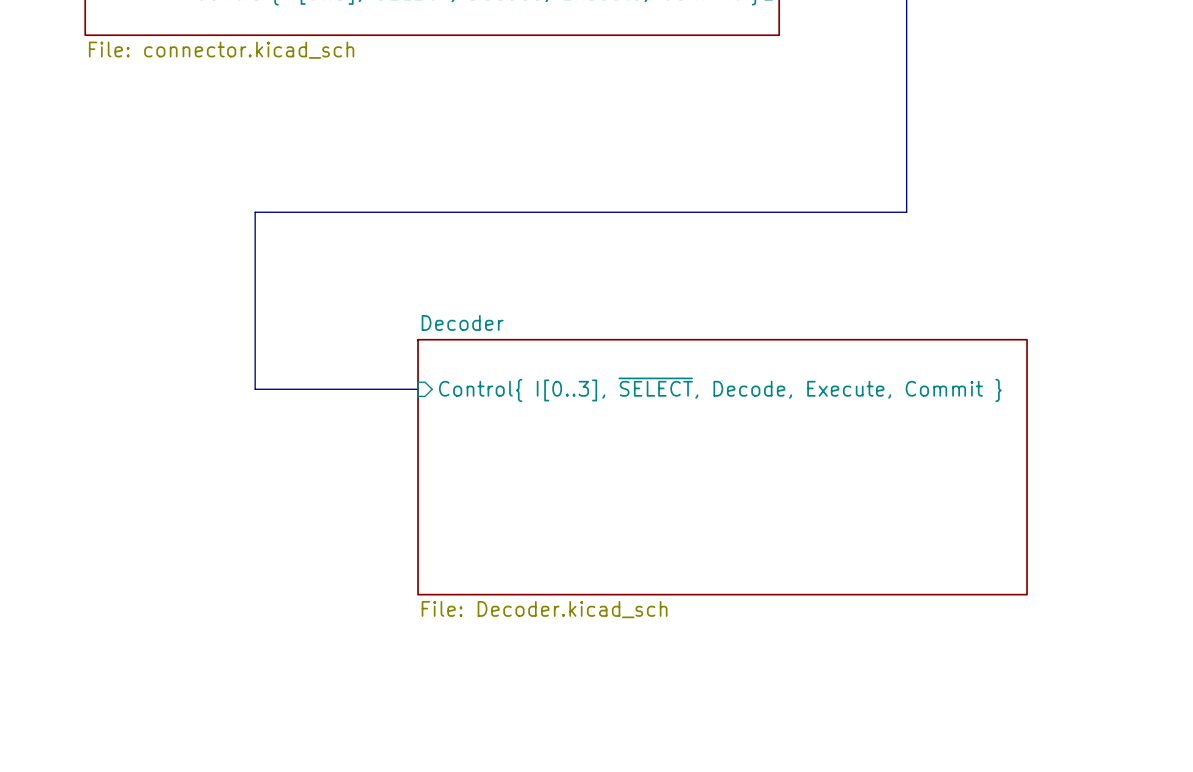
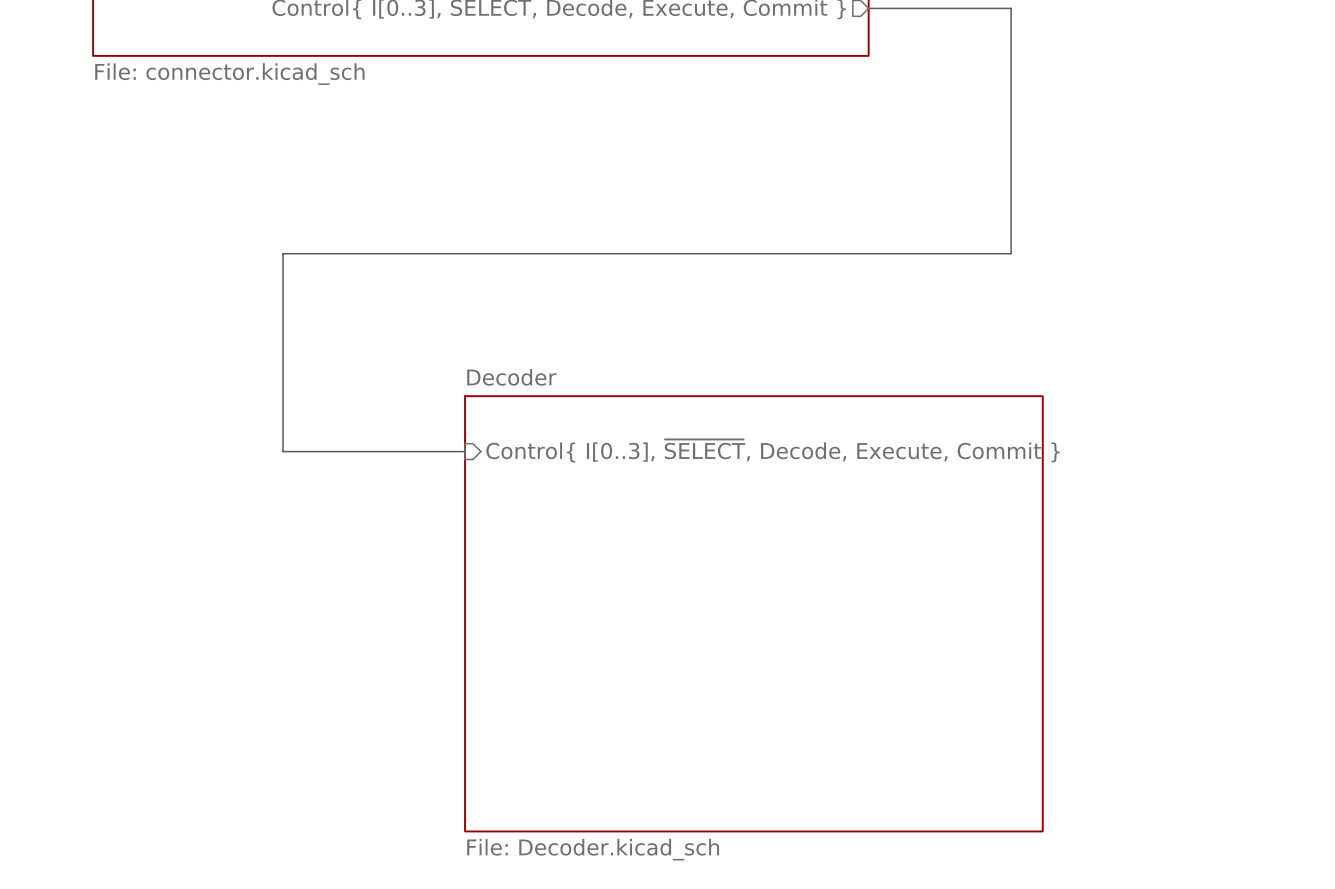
sheet Decoder: File: Decoder.kicad_sch (722, 467) -> none
sheet Decoder: none -> File: Decoder.kicad_sch (753, 613)

